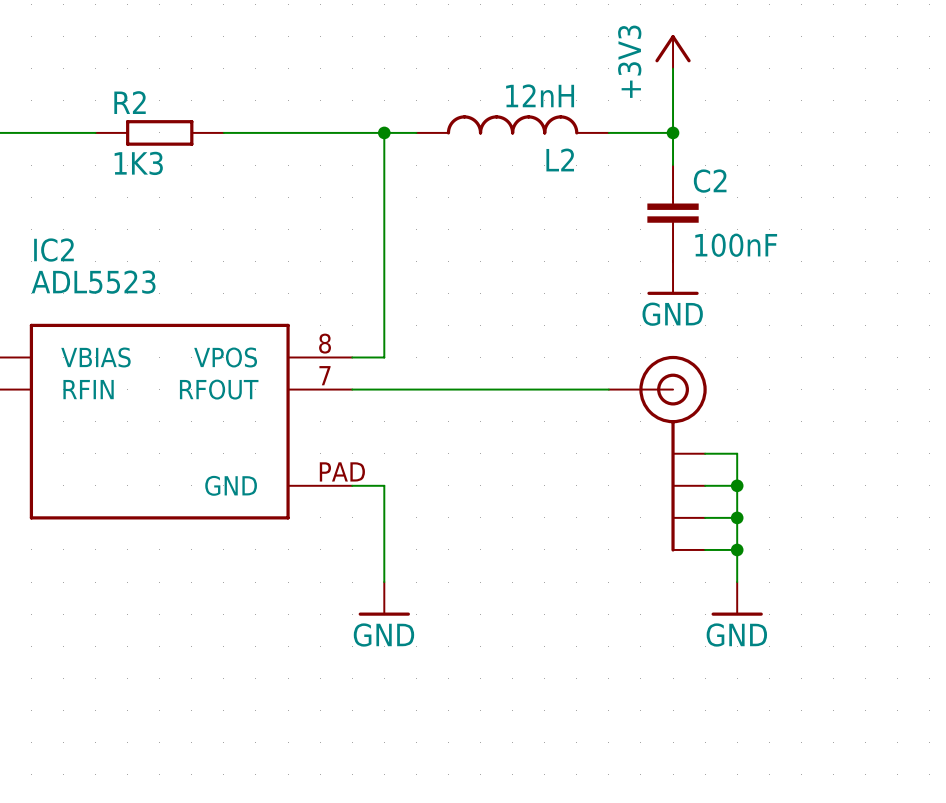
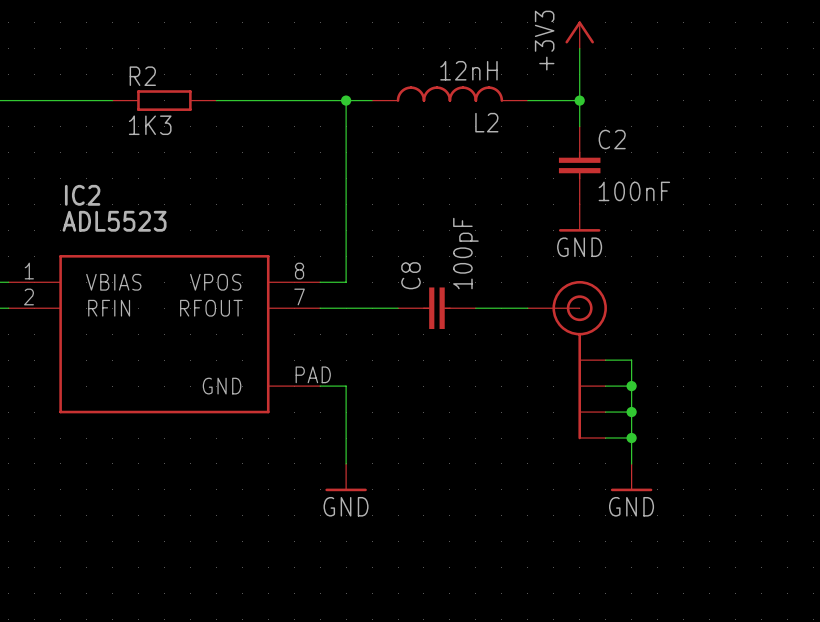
C8: none -> 100pF (436, 308)

